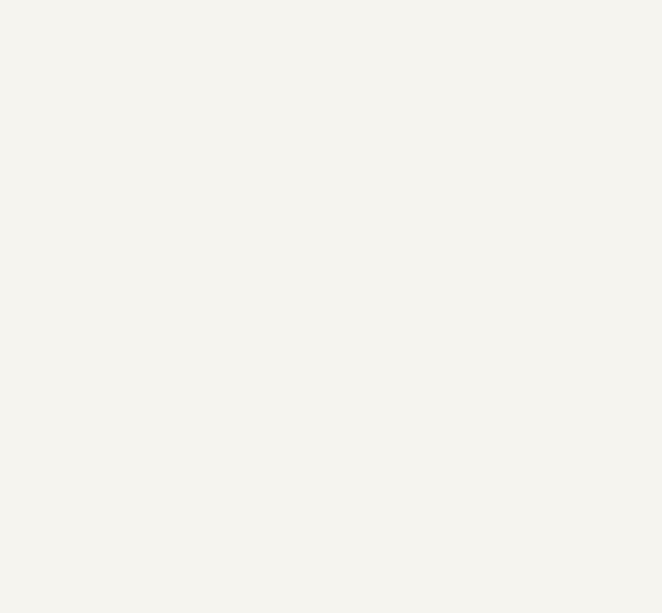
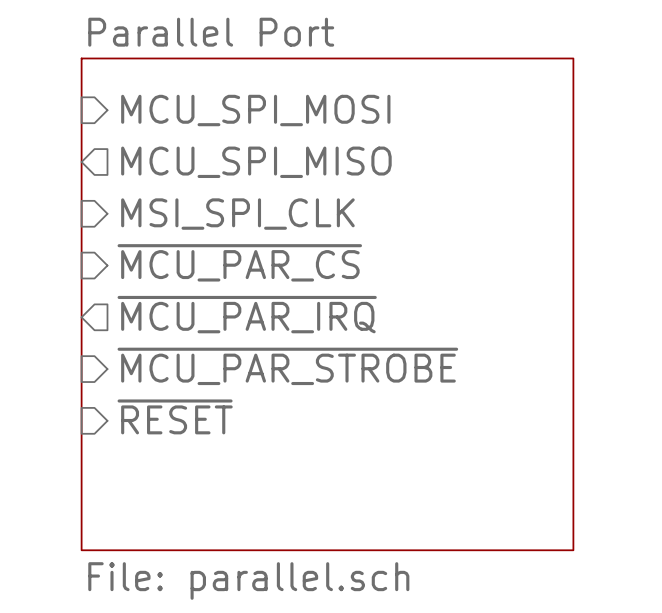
sheet pin: none -> MCU_SPI_MOSI (255, 110)
sheet pin: none -> MCU_SPI_MISO (256, 162)
sheet pin: none -> MSI_SPI_CLK (237, 214)
sheet pin: none -> ~{MCU_PAR_CS} (239, 262)
sheet Parallel Port: none -> File: parallel.sch (327, 304)
sheet pin: none -> ~{MCU_PAR_IRQ} (247, 314)
sheet pin: none -> ~{MCU_PAR_STROBE} (287, 366)
sheet pin: none -> ~{RESET} (175, 416)

